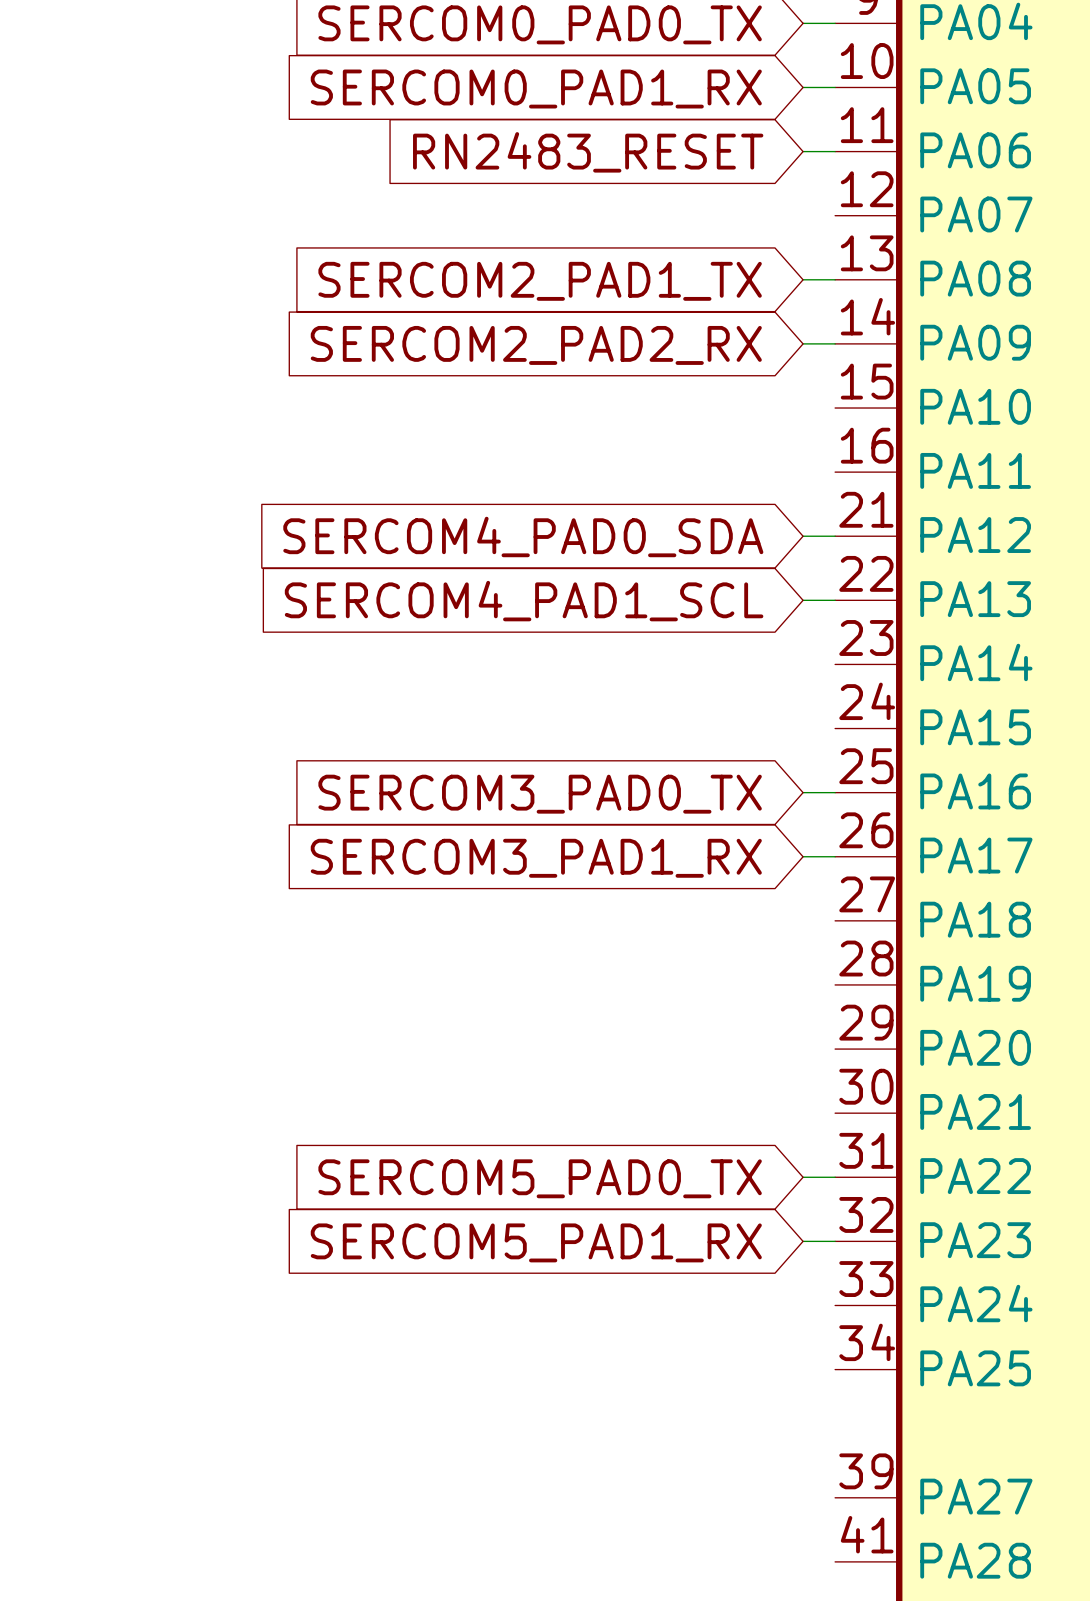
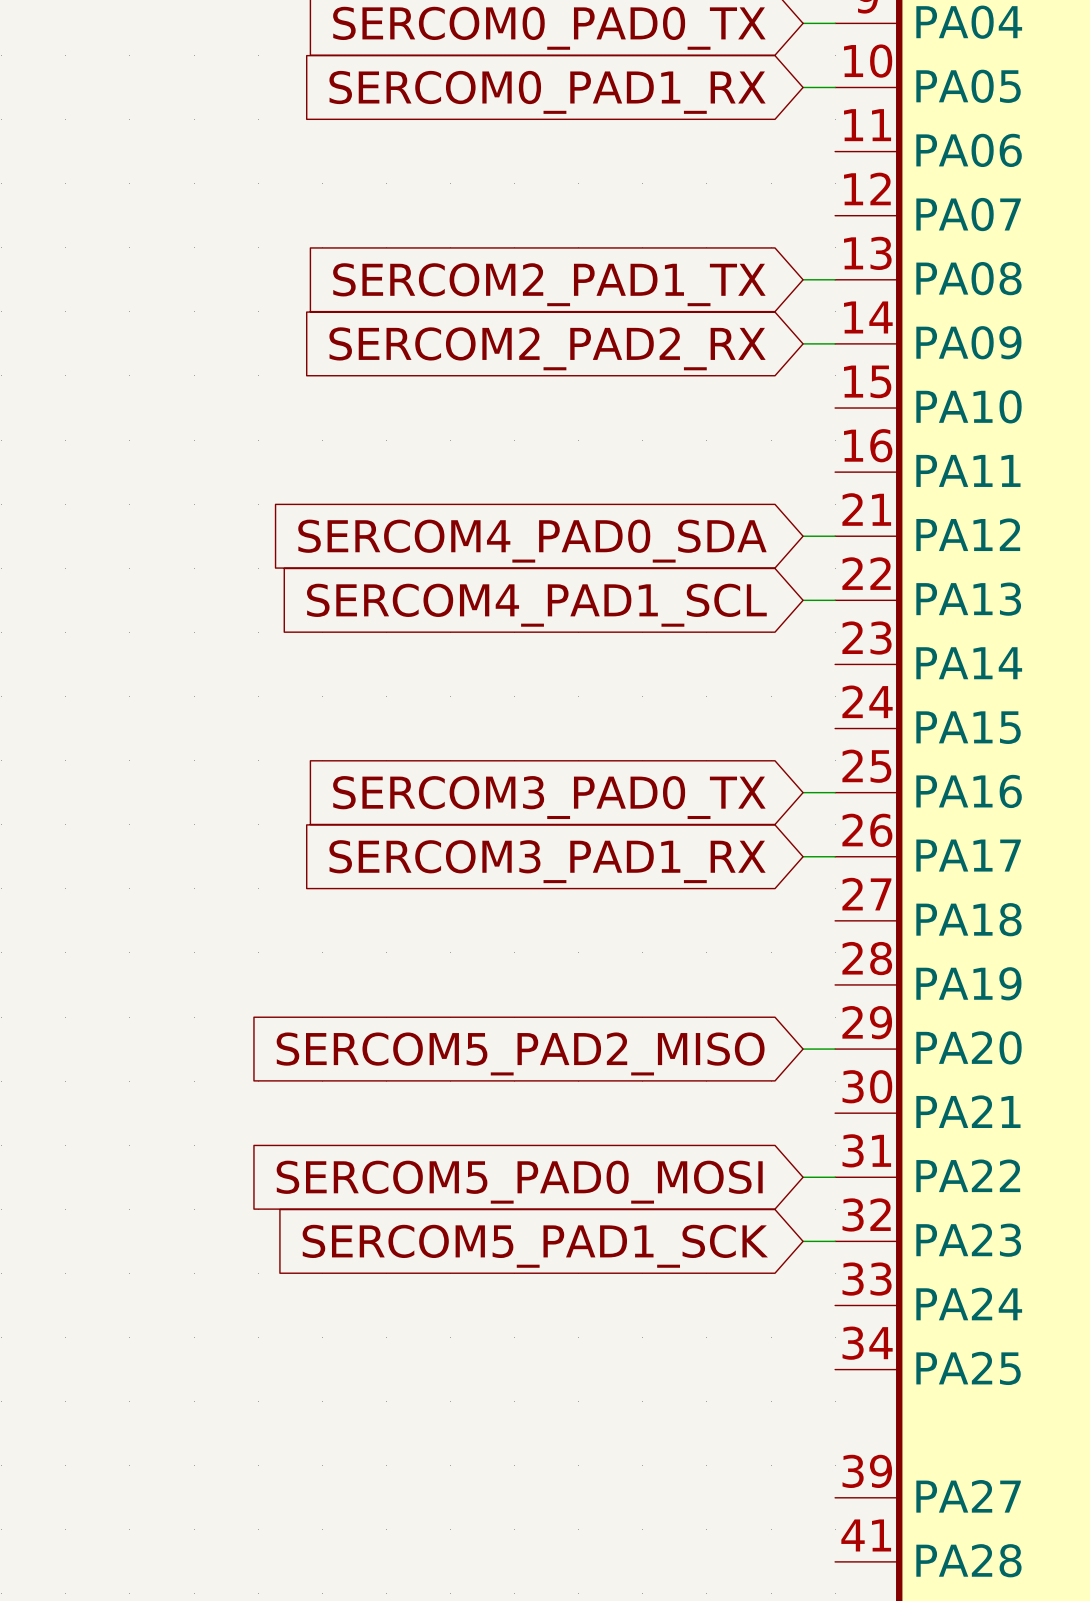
wire: (803, 151) (835, 151) -> none
global label: RN2483_RESET (588, 152) -> none
wire: none -> (803, 1049) (835, 1049)
global label: none -> SERCOM5_PAD2_MISO (520, 1053)
global label: SERCOM5_PAD0_TX (540, 1178) -> SERCOM5_PAD0_MOSI (519, 1182)
global label: SERCOM5_PAD1_RX (536, 1242) -> SERCOM5_PAD1_SCK (535, 1246)

